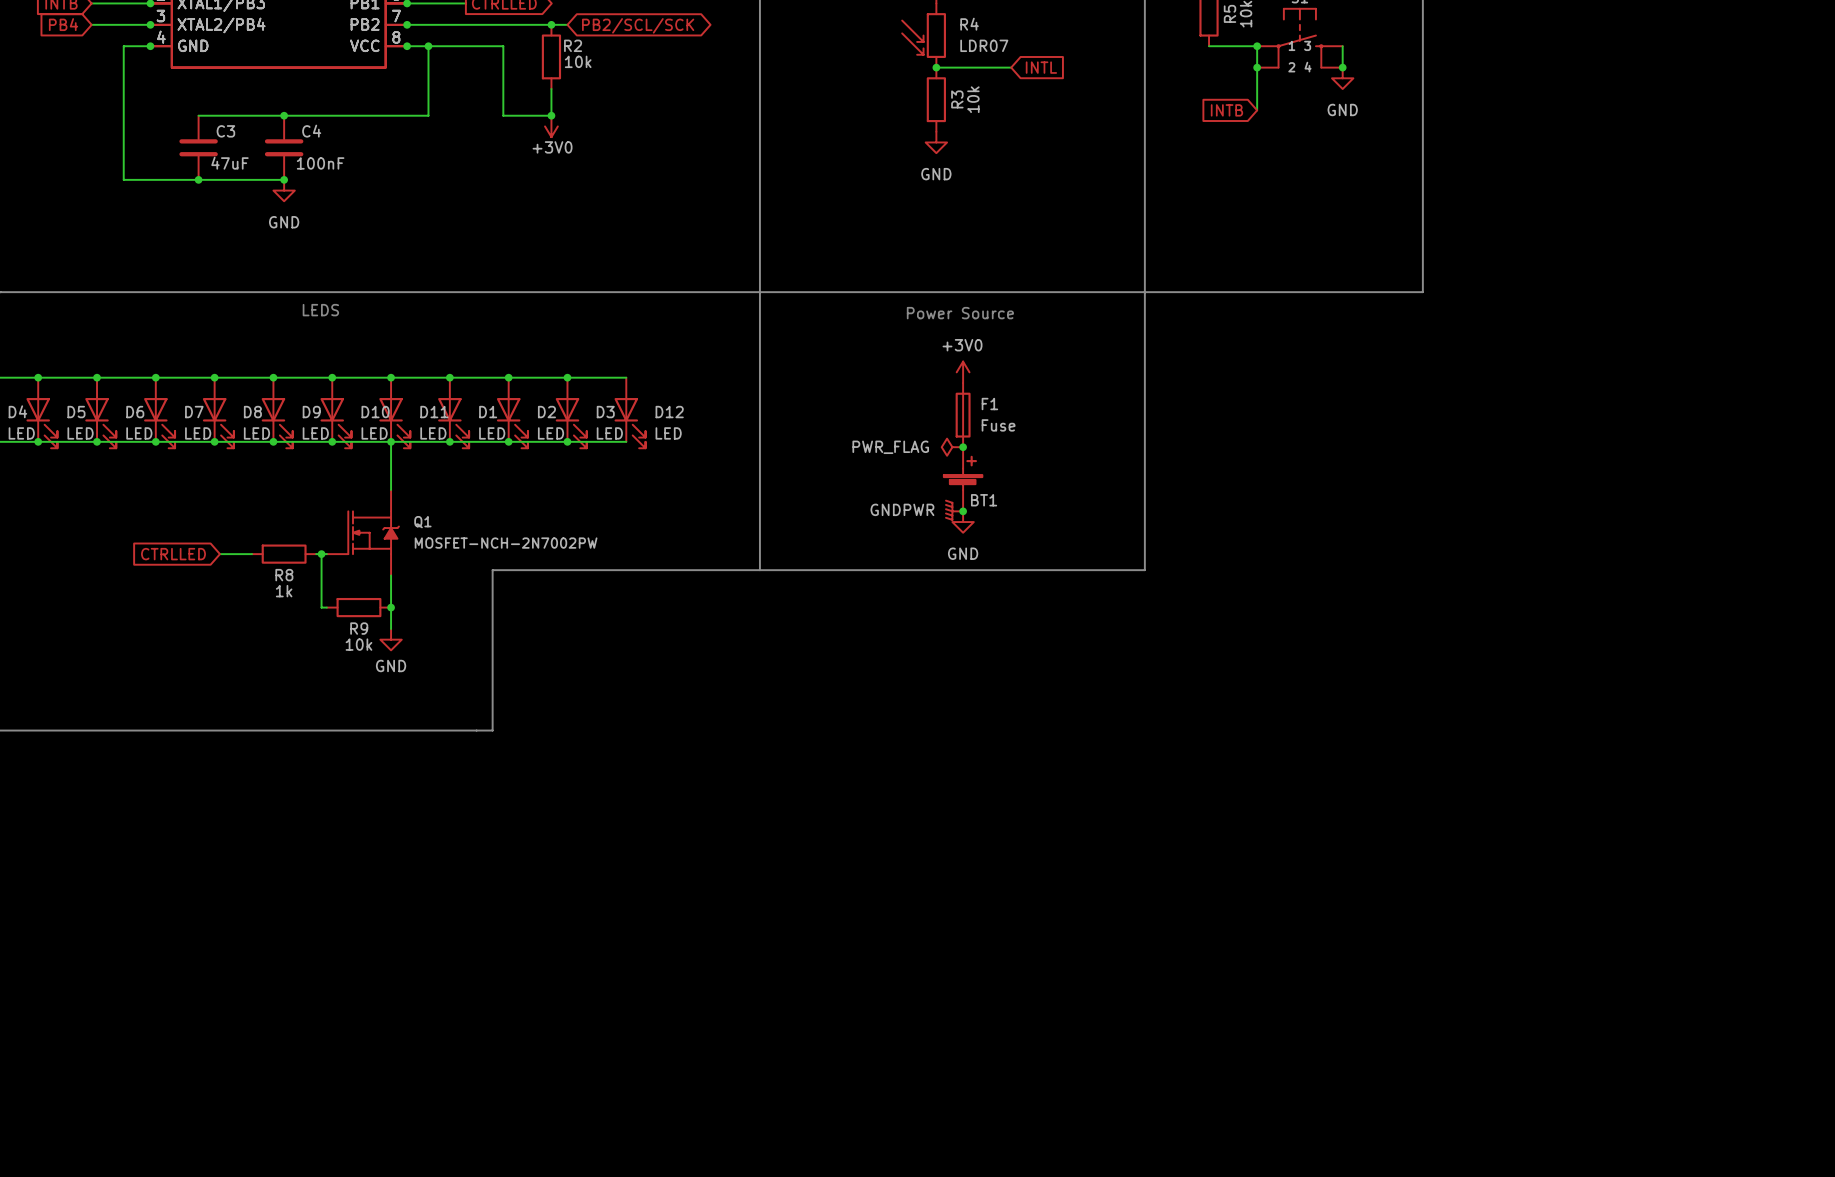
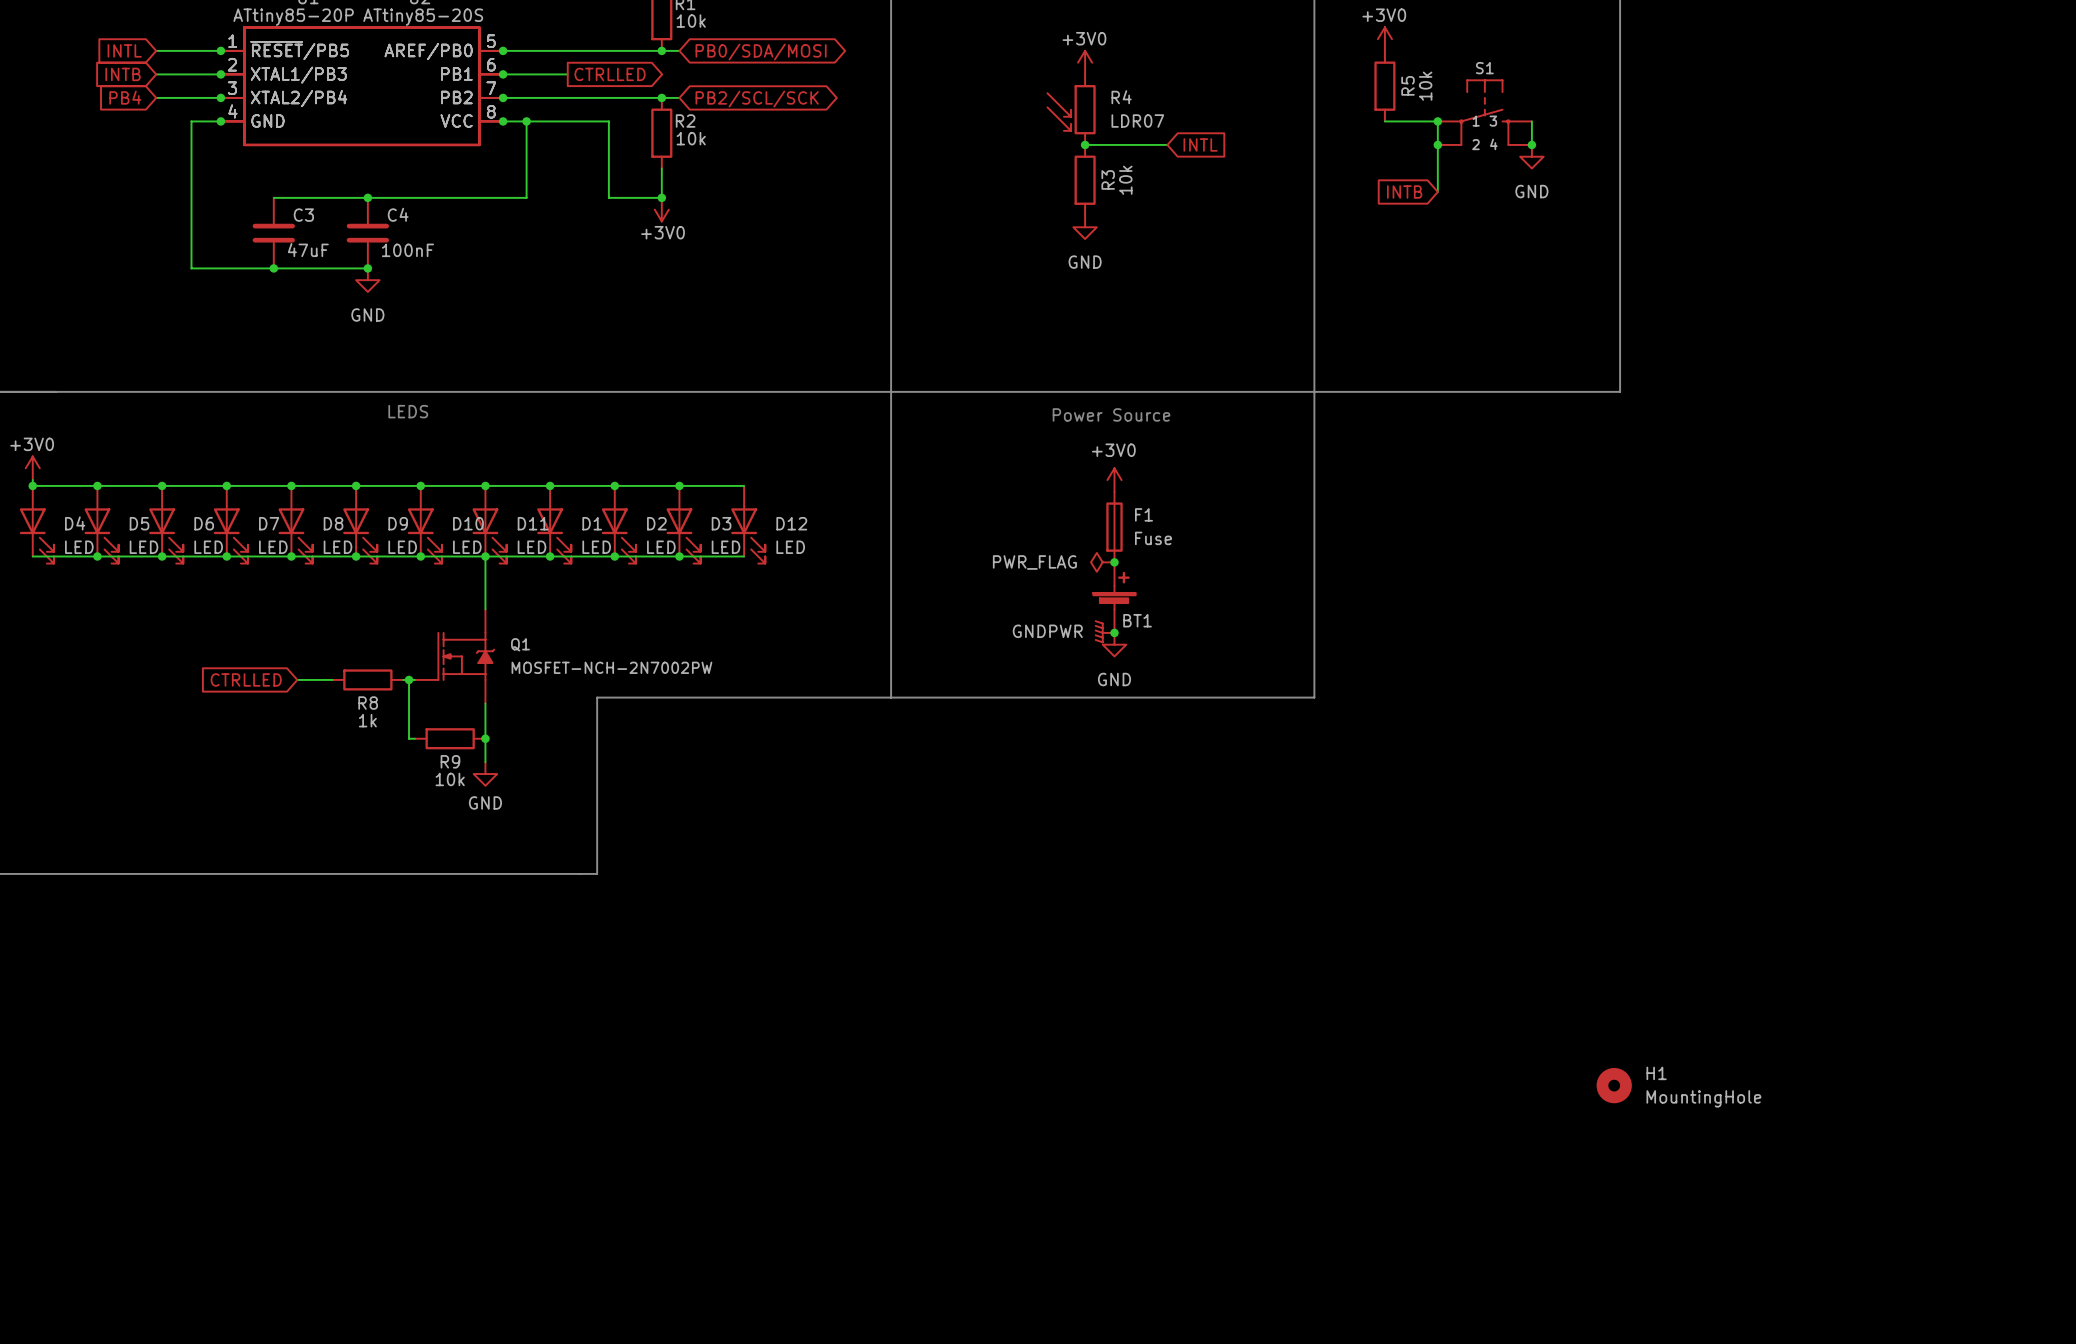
H1: none -> MountingHole (1614, 1085)

